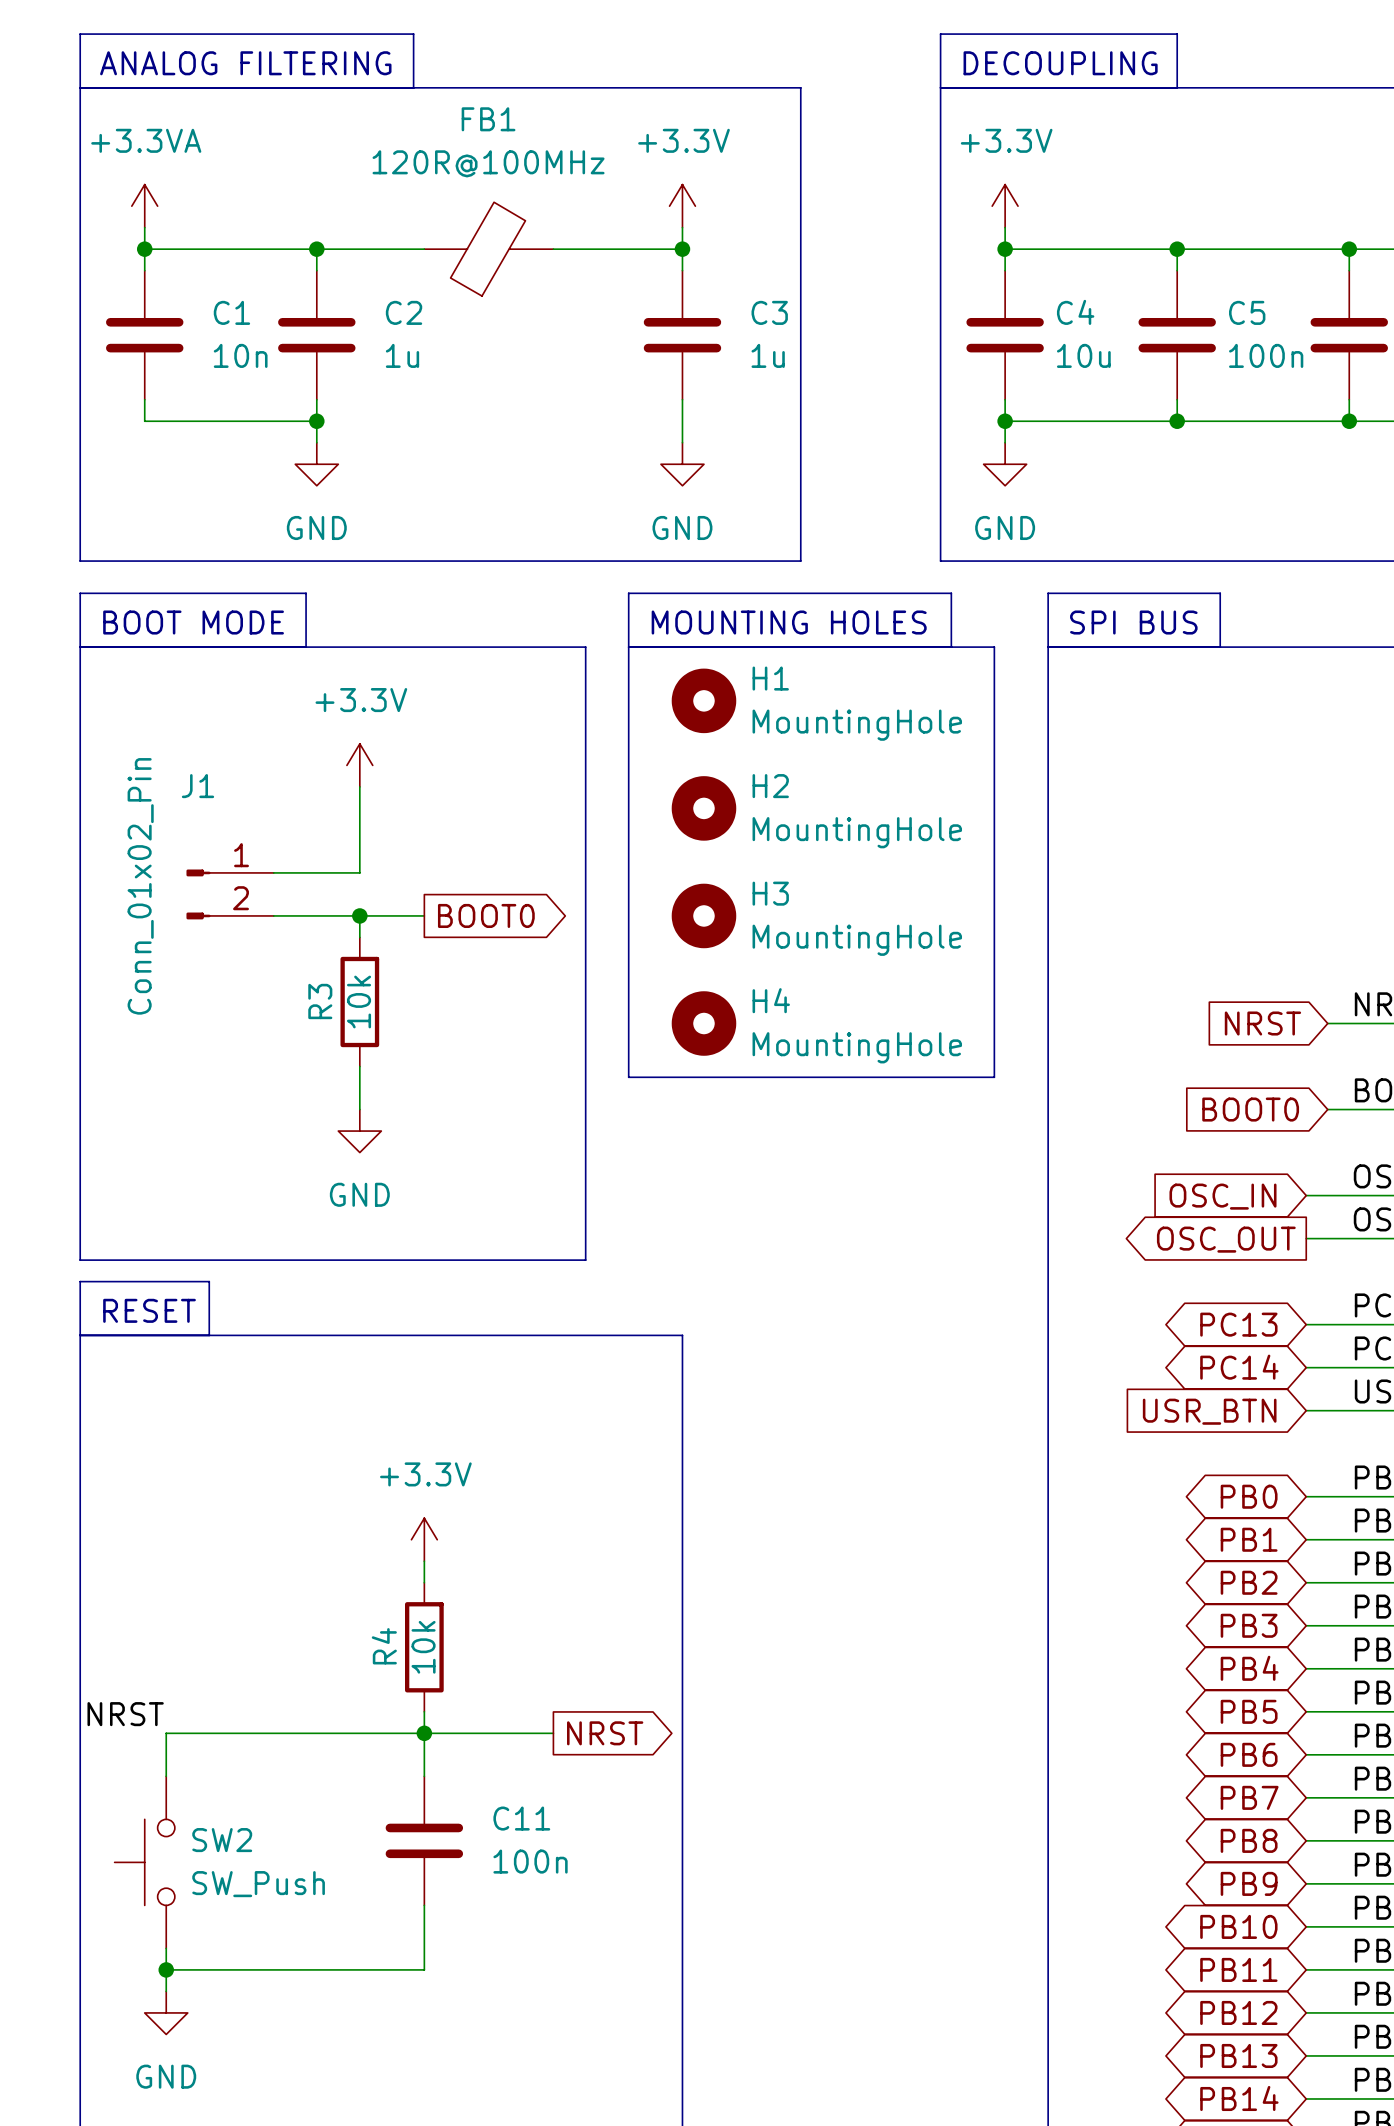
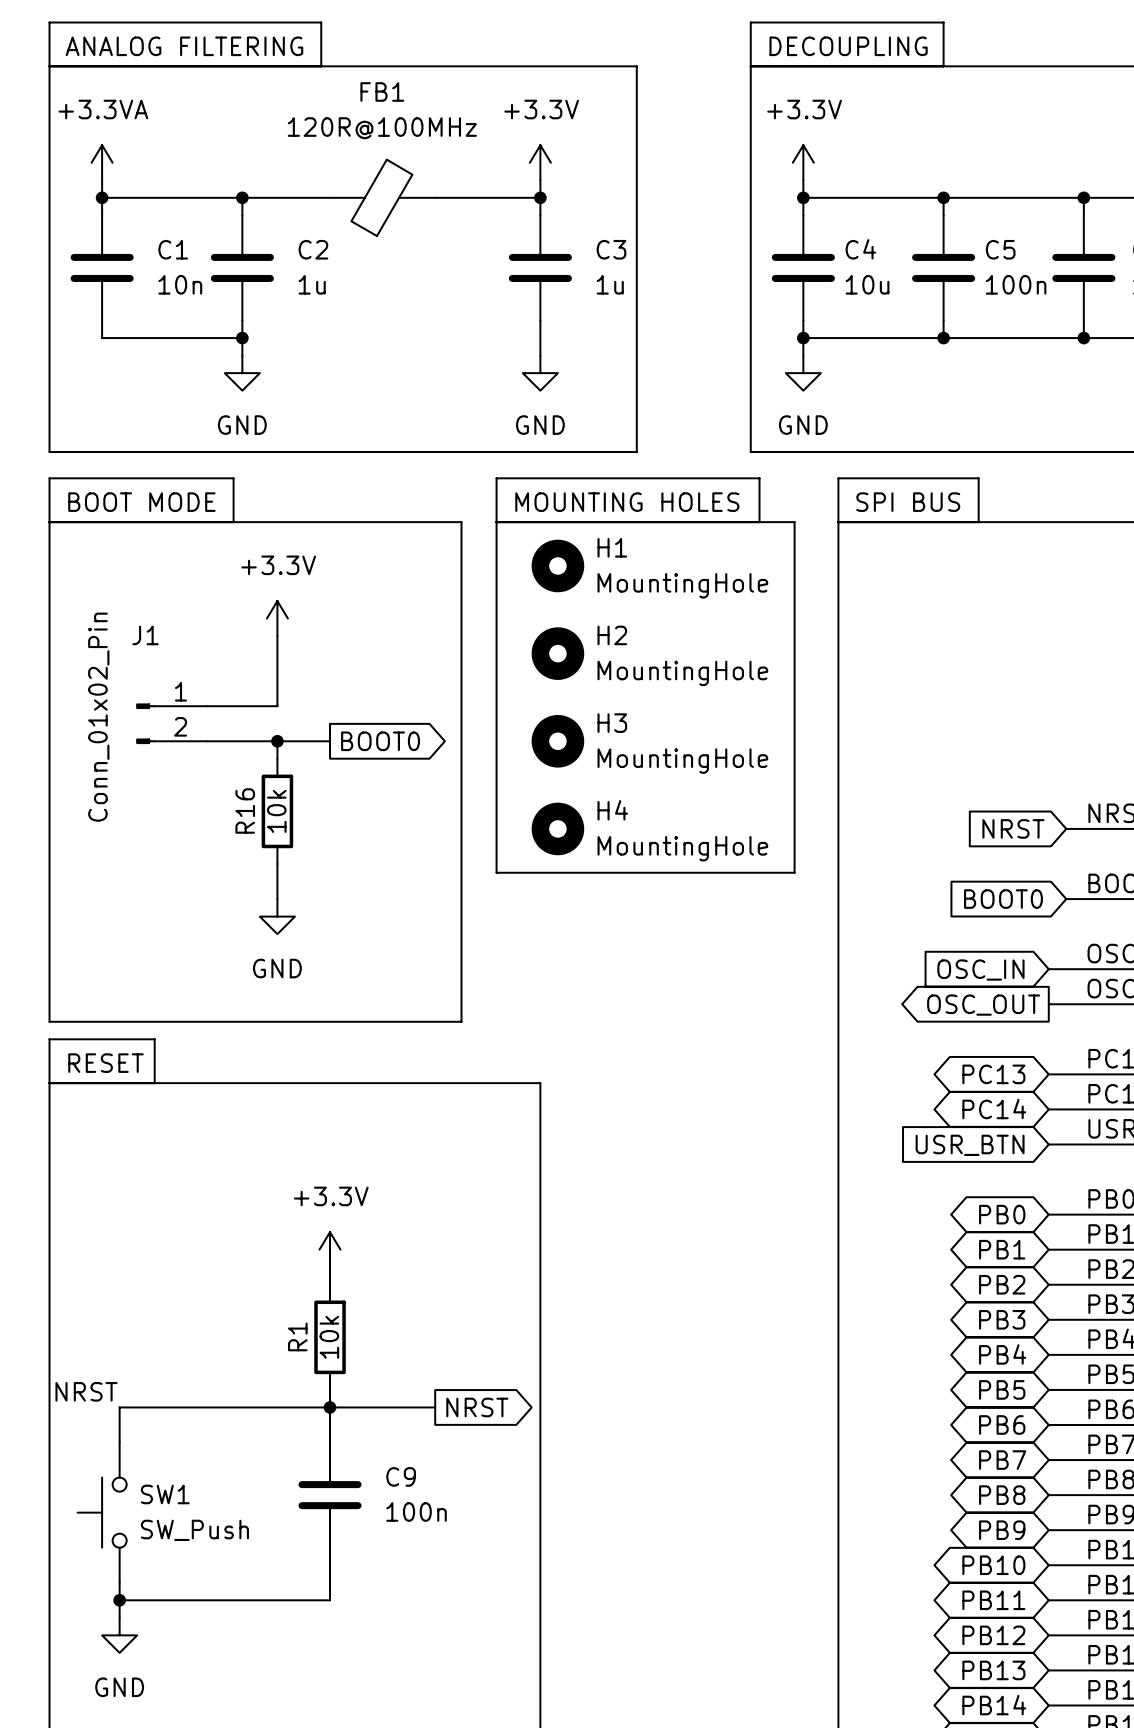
R3 name: R3 (320, 1001) -> R16 (245, 810)
R4 name: R4 (384, 1646) -> R1 (297, 1336)
C11 name: C11 (521, 1818) -> C9 (401, 1476)
SW2 name: SW2 (222, 1840) -> SW1 (165, 1494)

